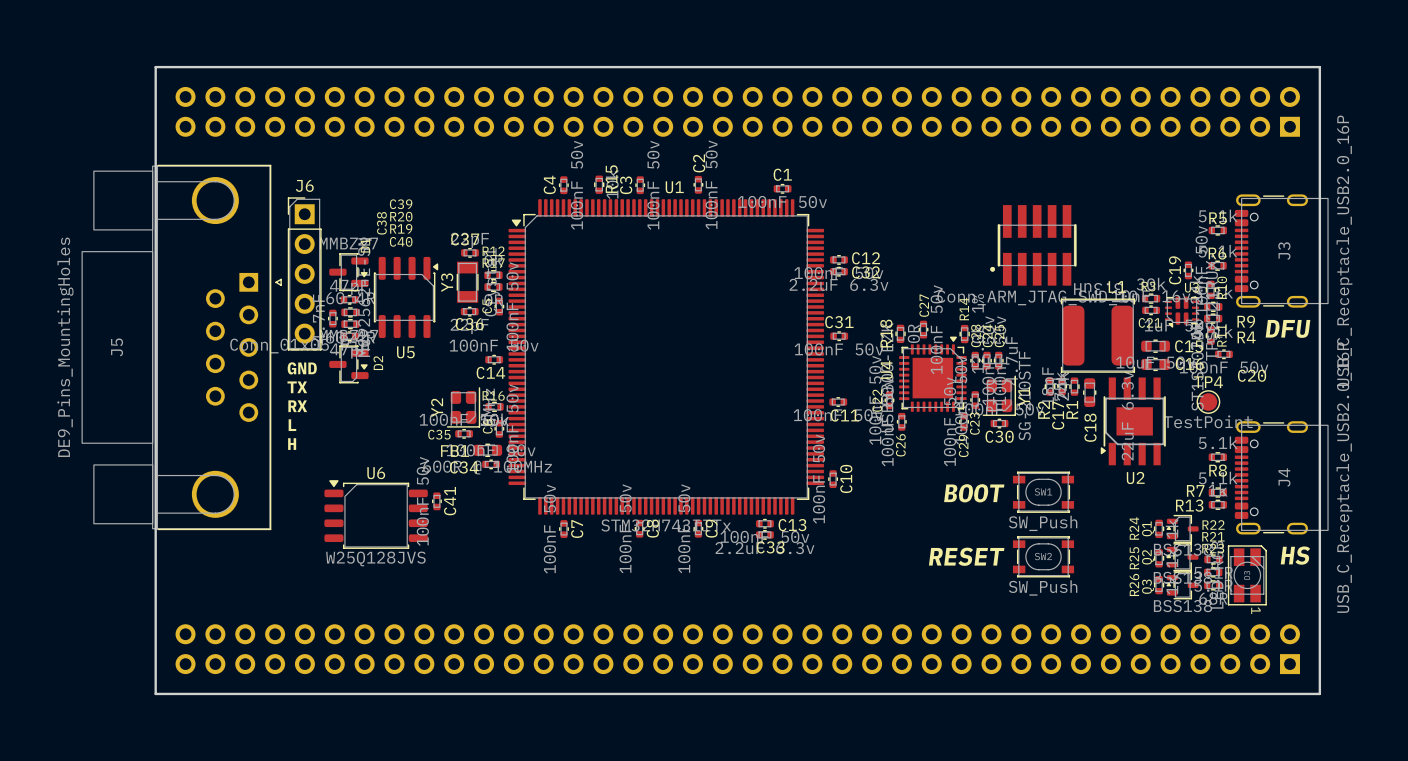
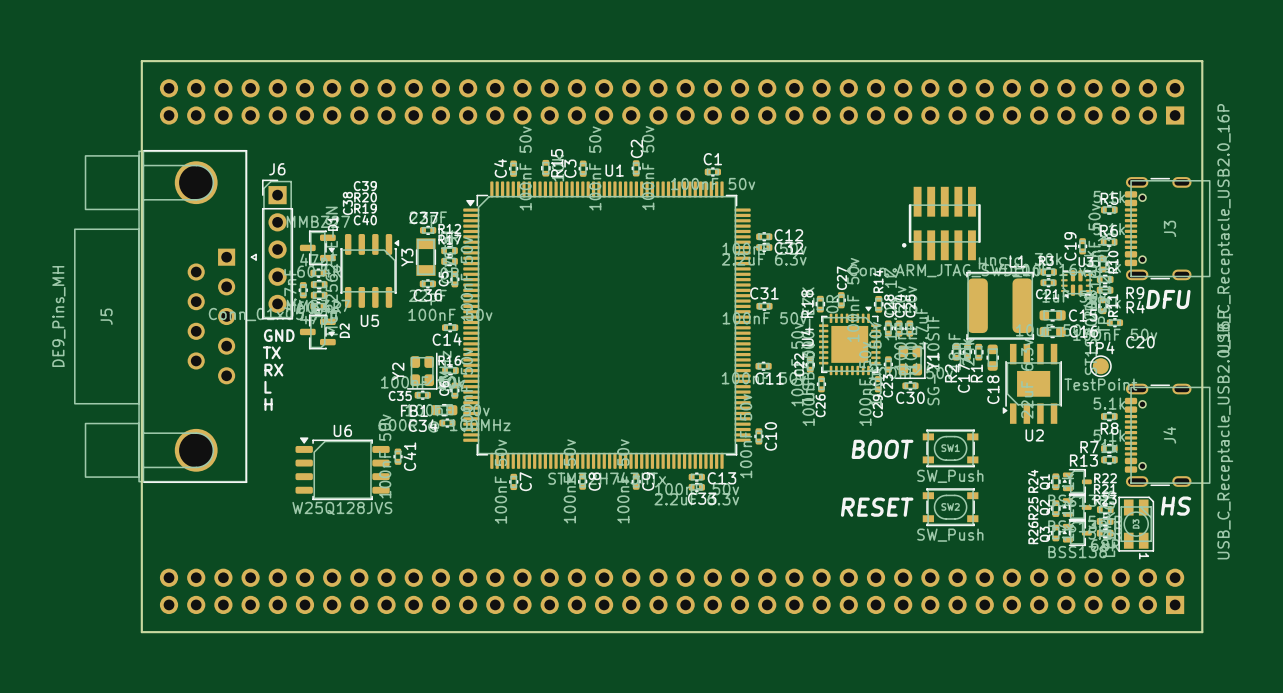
J5 value: DE9_Pins_MountingHoles (65, 347) -> DE9_Pins_MH (58, 316)

